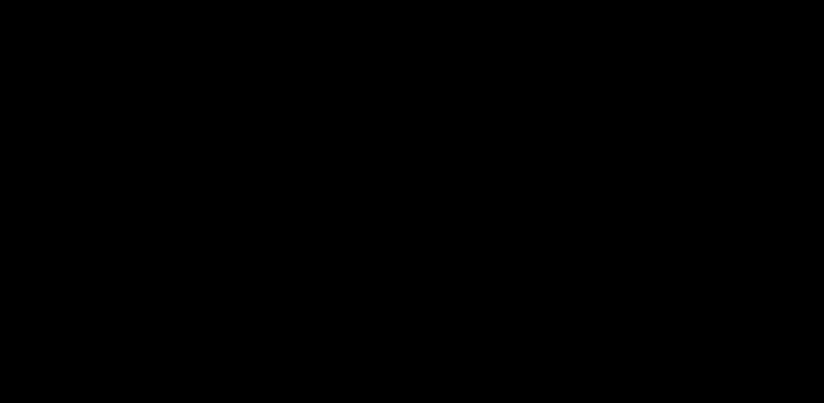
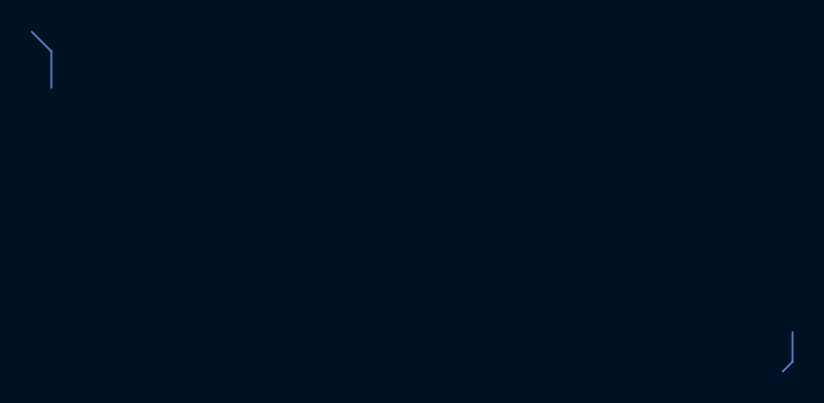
track: none -> (31, 31) (51, 51) (51, 87)
track: none -> (792, 332) (792, 361) (782, 371)

